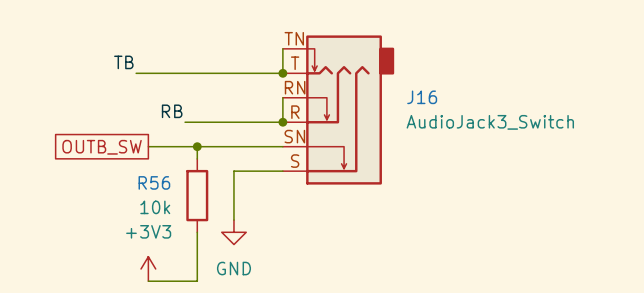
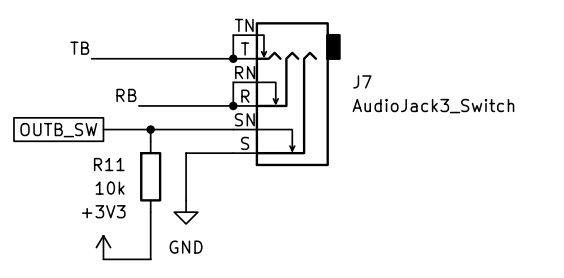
J16 name: J16 (422, 97) -> J7 (362, 81)
R56 name: R56 (154, 182) -> R11 (109, 164)

